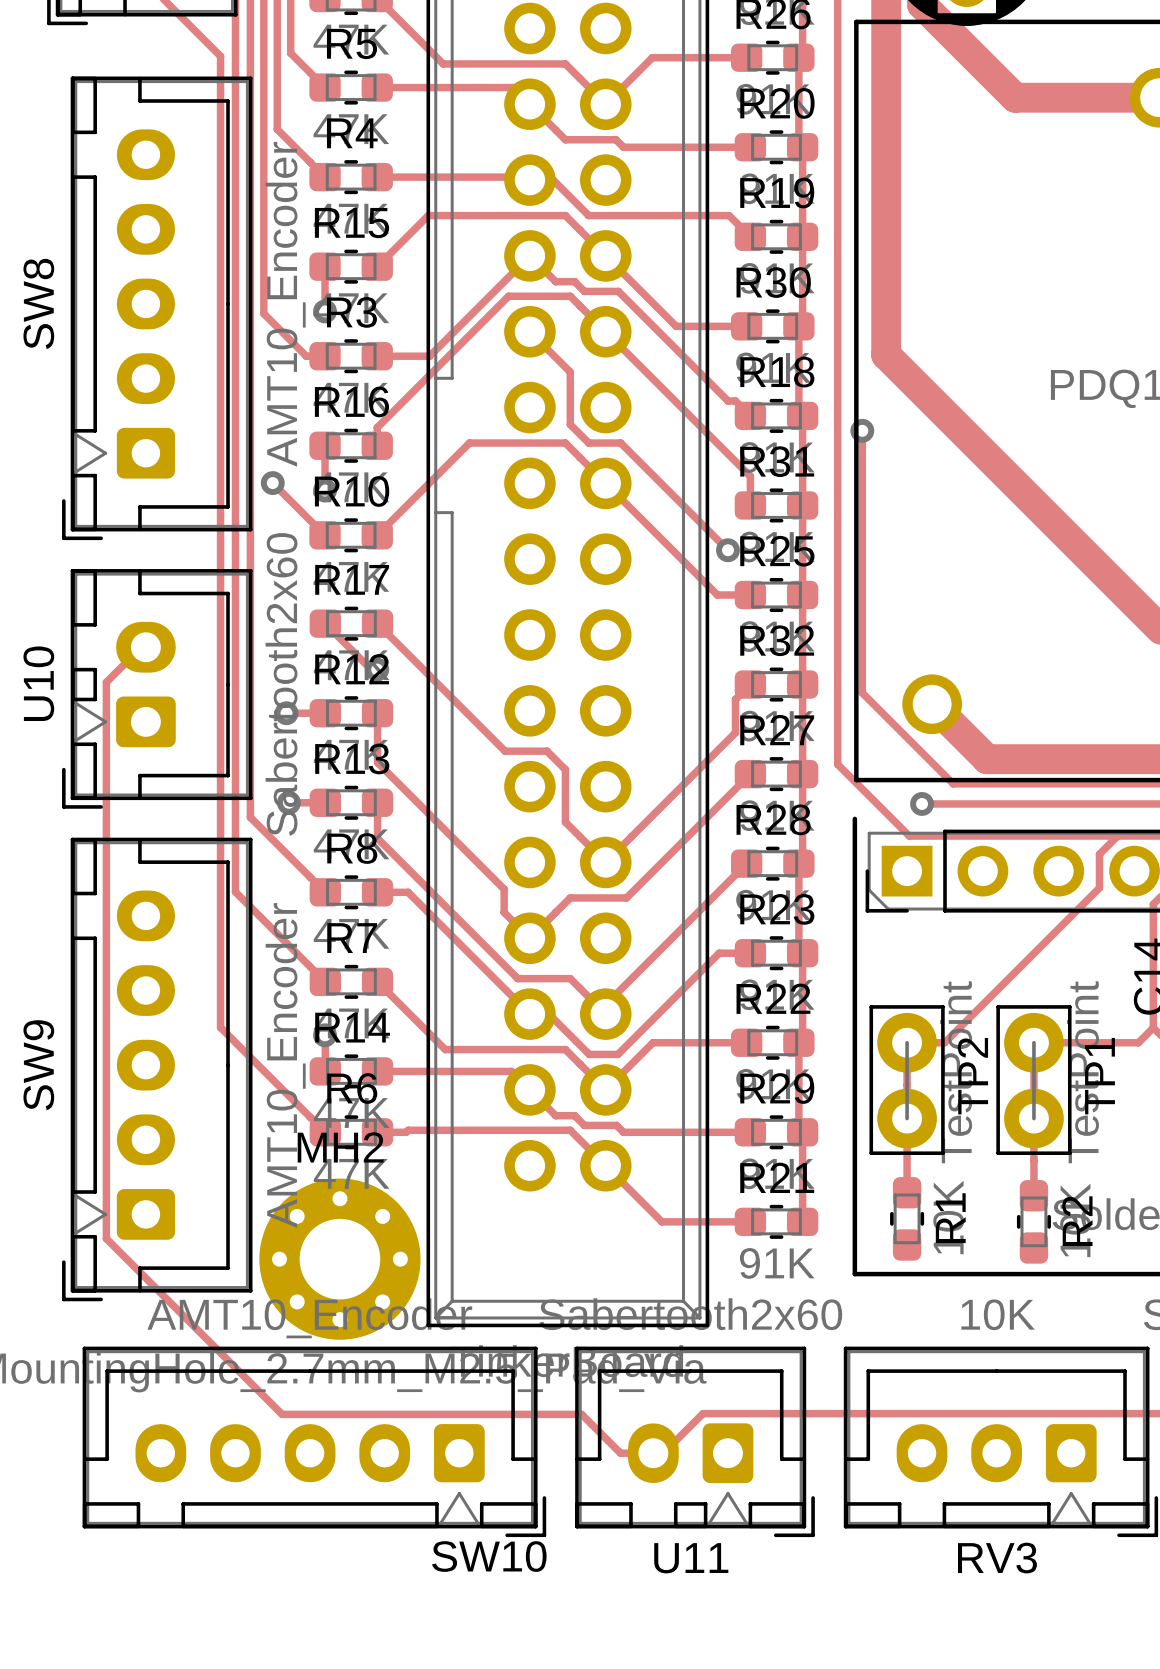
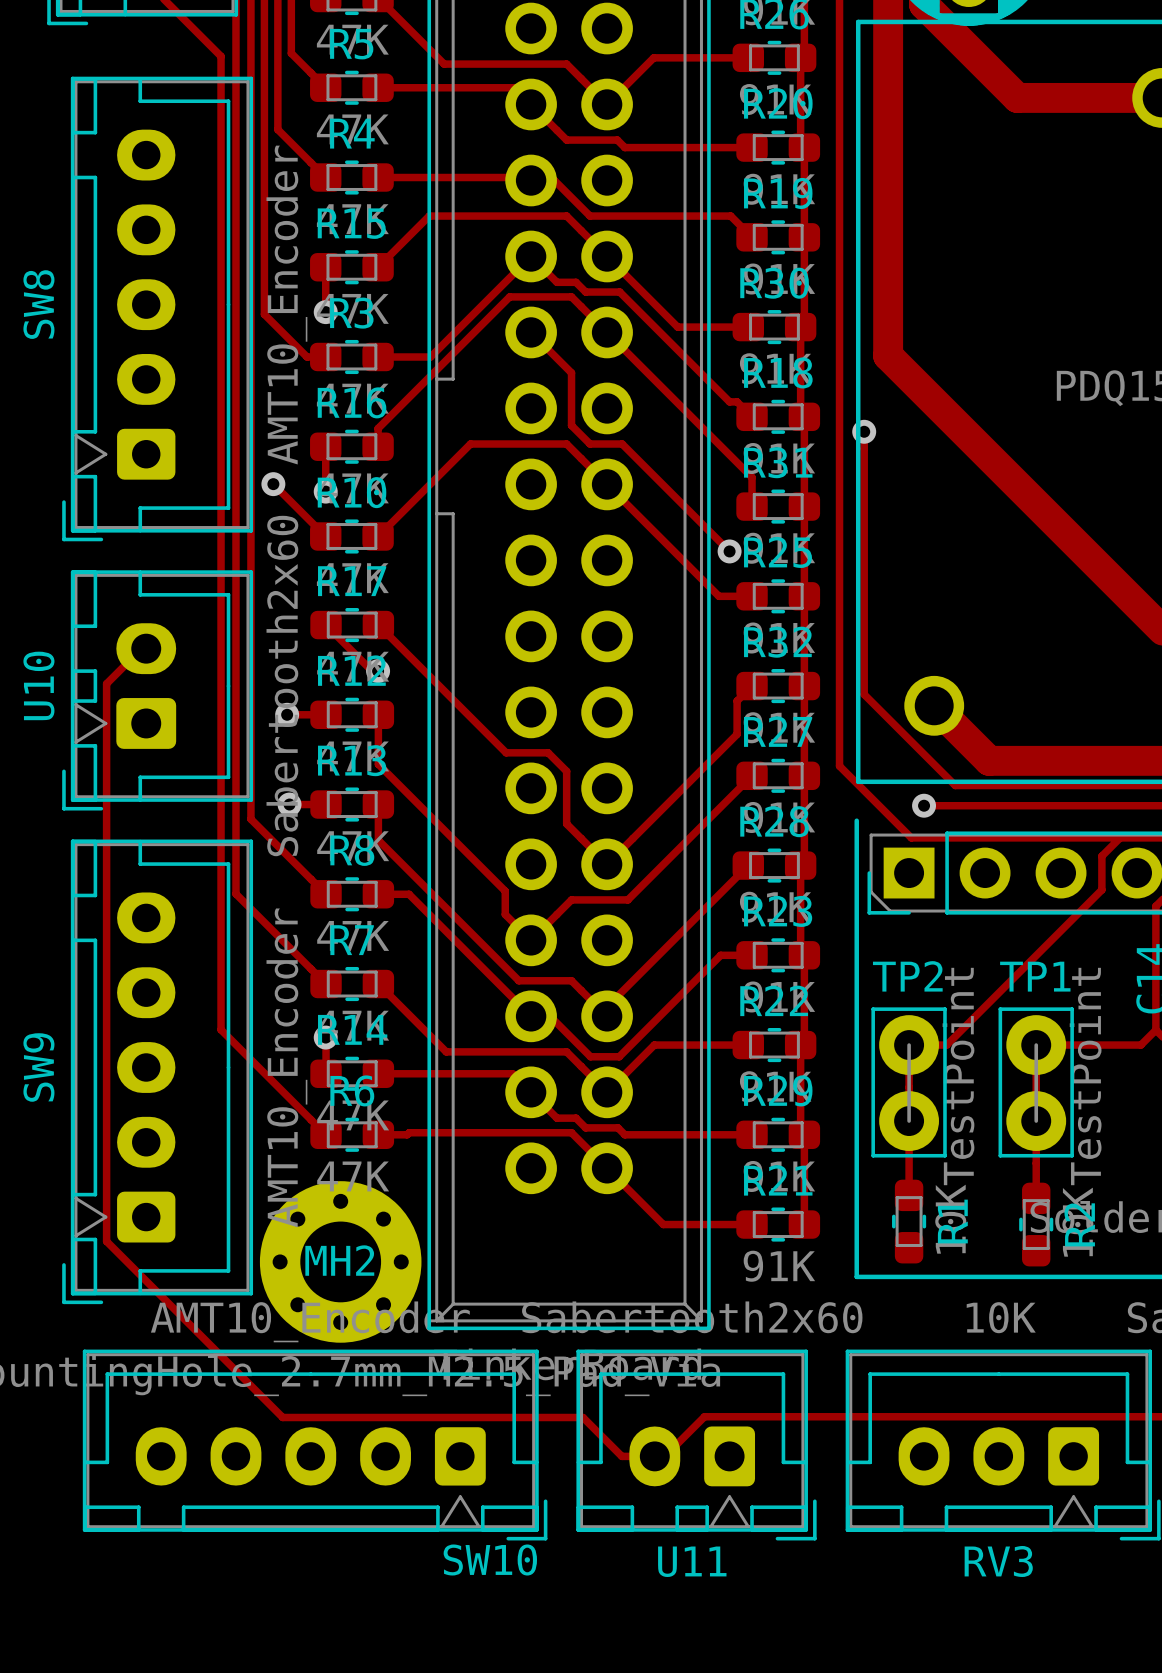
TP2 name rotation: 0° (972, 1076) -> 90° clockwise (907, 976)
TP2 name position: TP2 (972, 1076) -> TP2 (907, 976)
TP1 name rotation: 0° (1099, 1076) -> 90° clockwise (1035, 976)
TP1 name position: TP1 (1099, 1076) -> TP1 (1035, 976)
MH2 name position: MH2 (340, 1147) -> MH2 (339, 1260)

